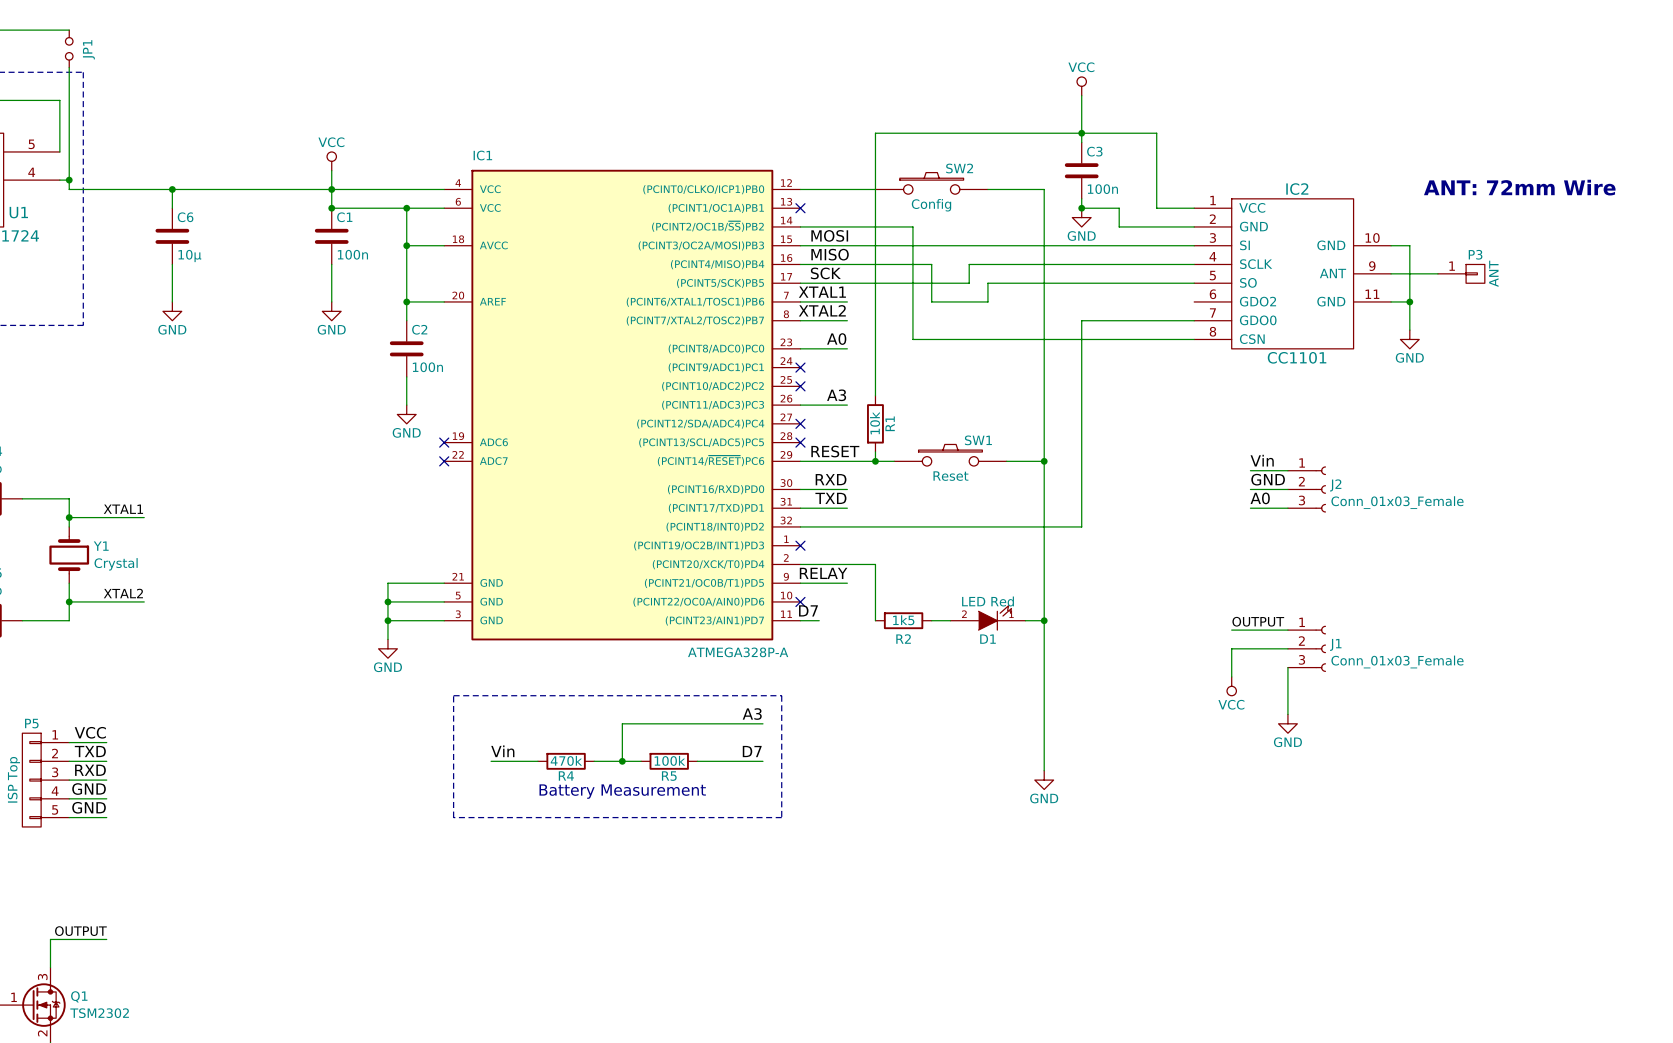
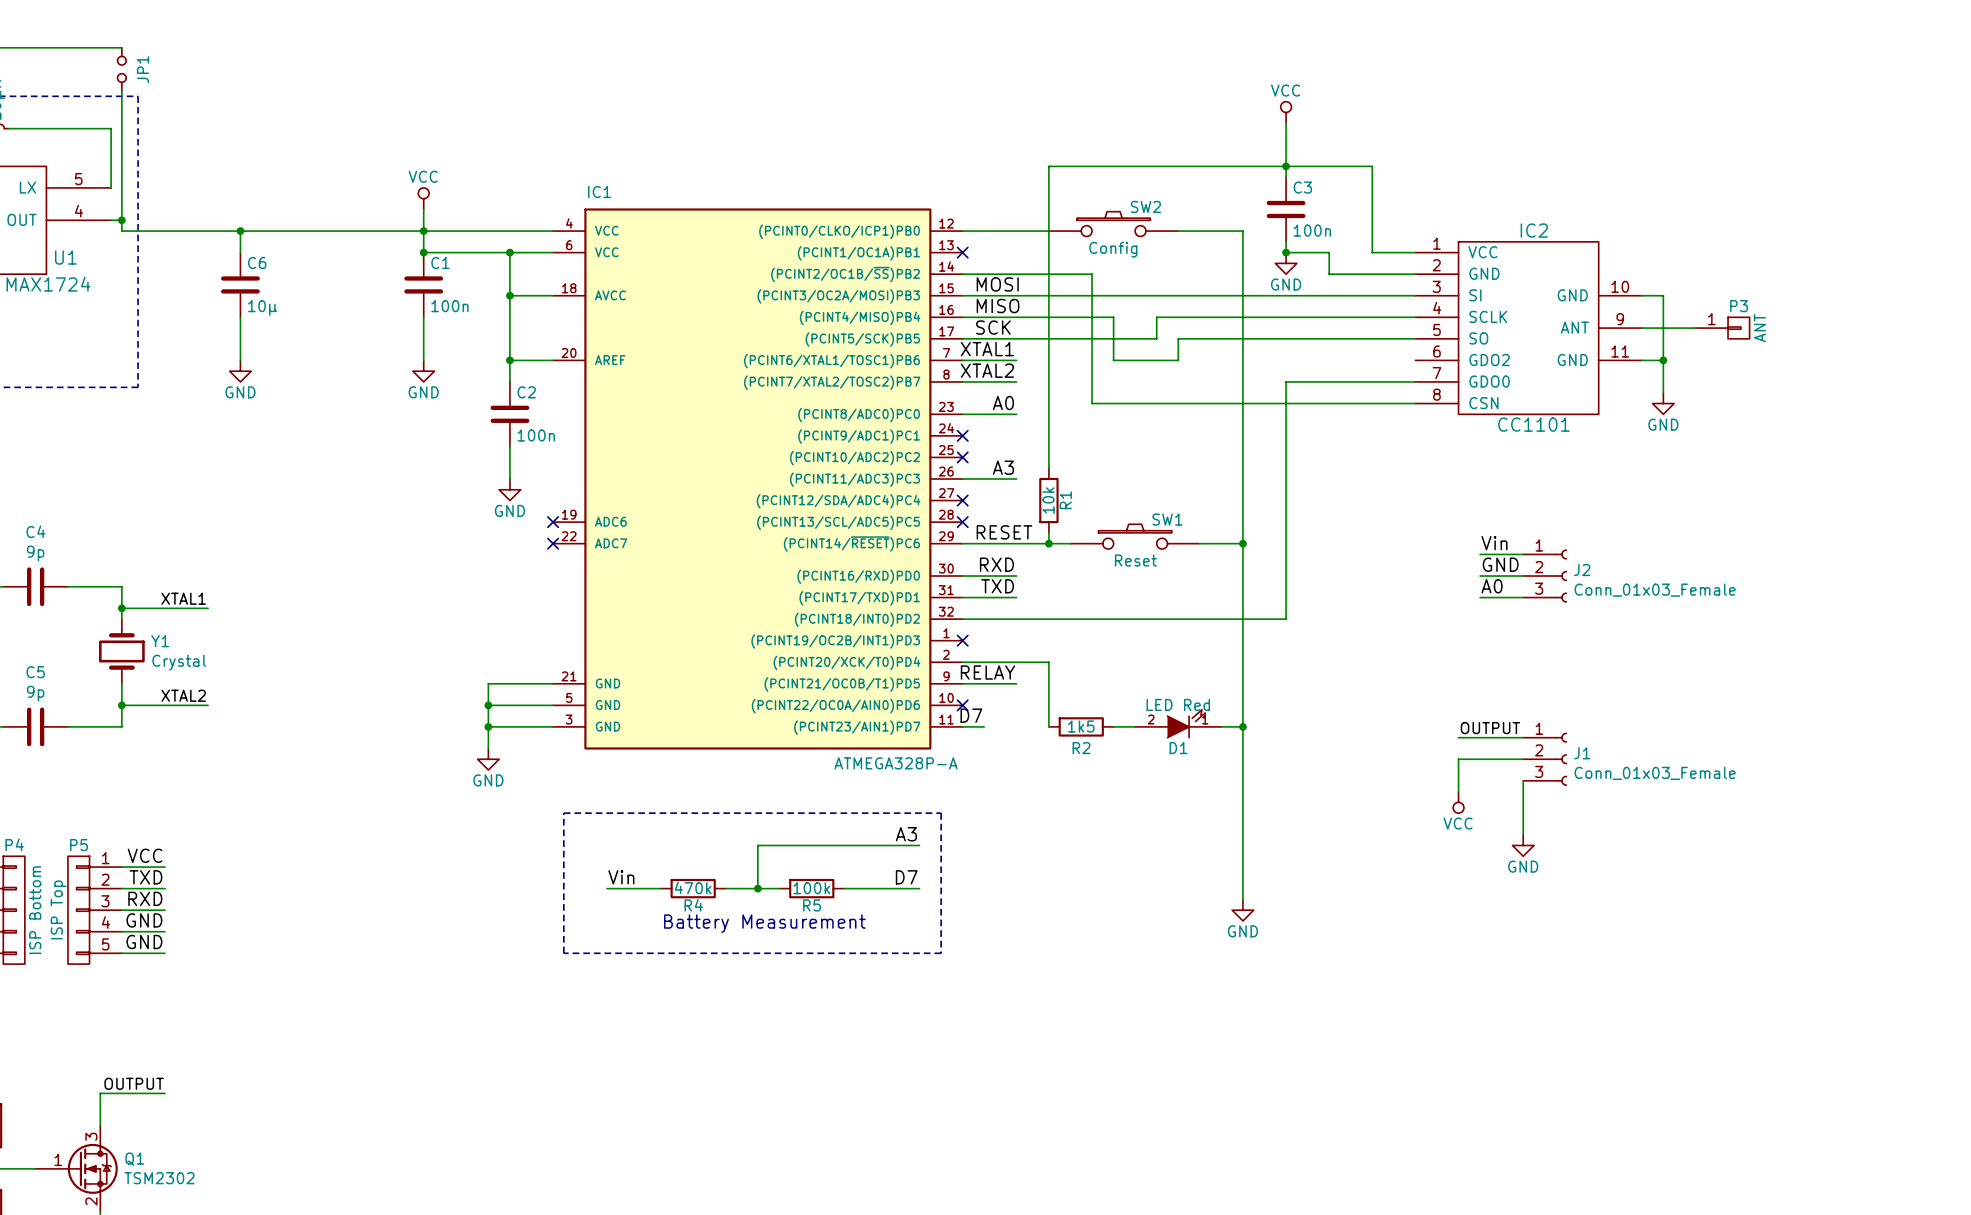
text: ANT: 72mm Wire (1519, 187) -> none

